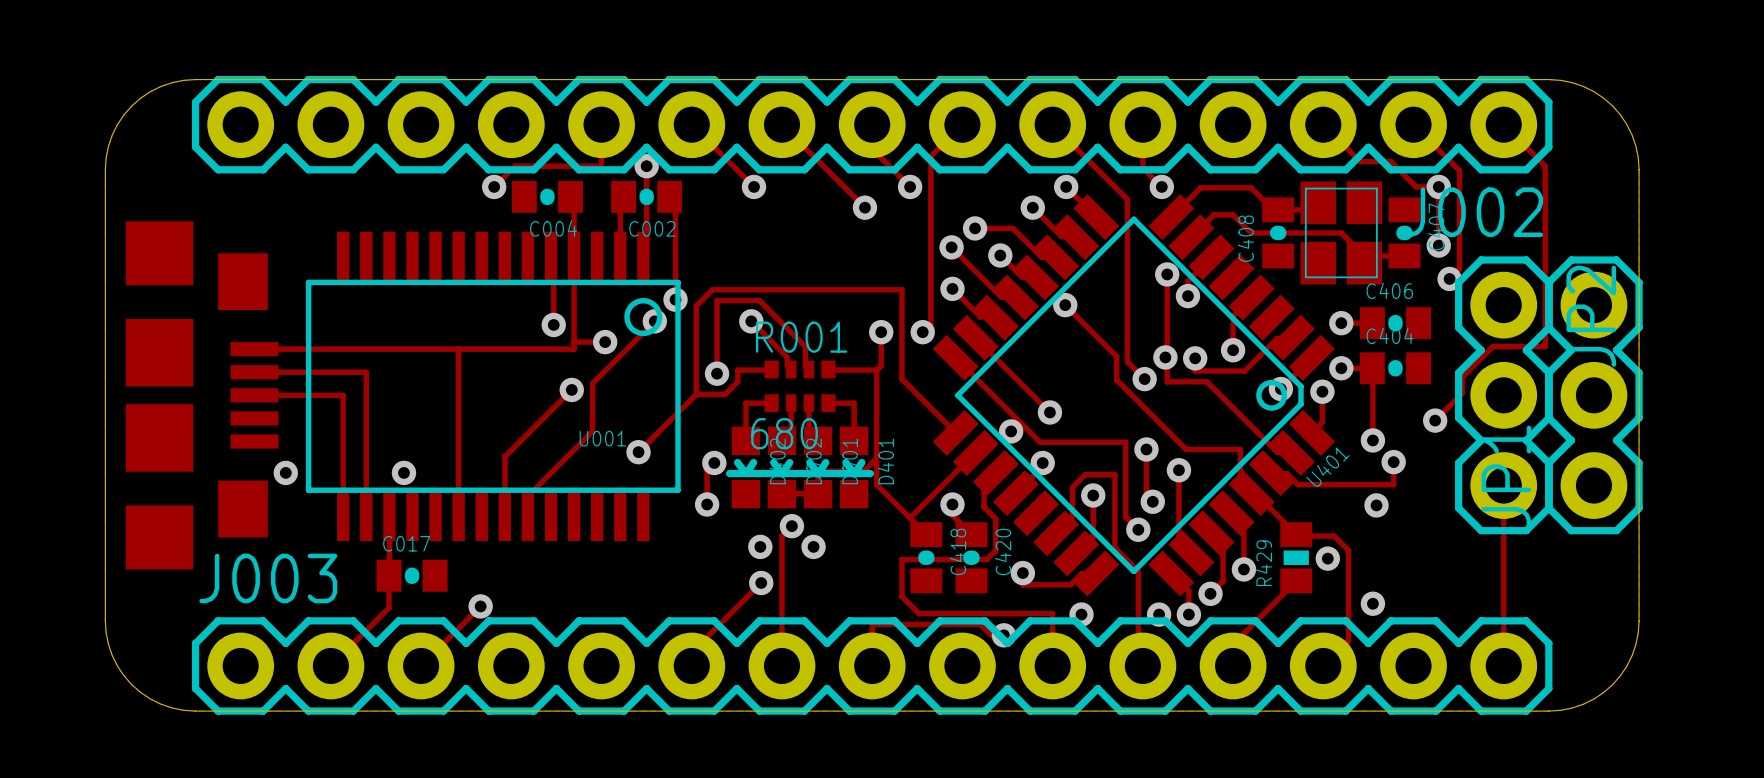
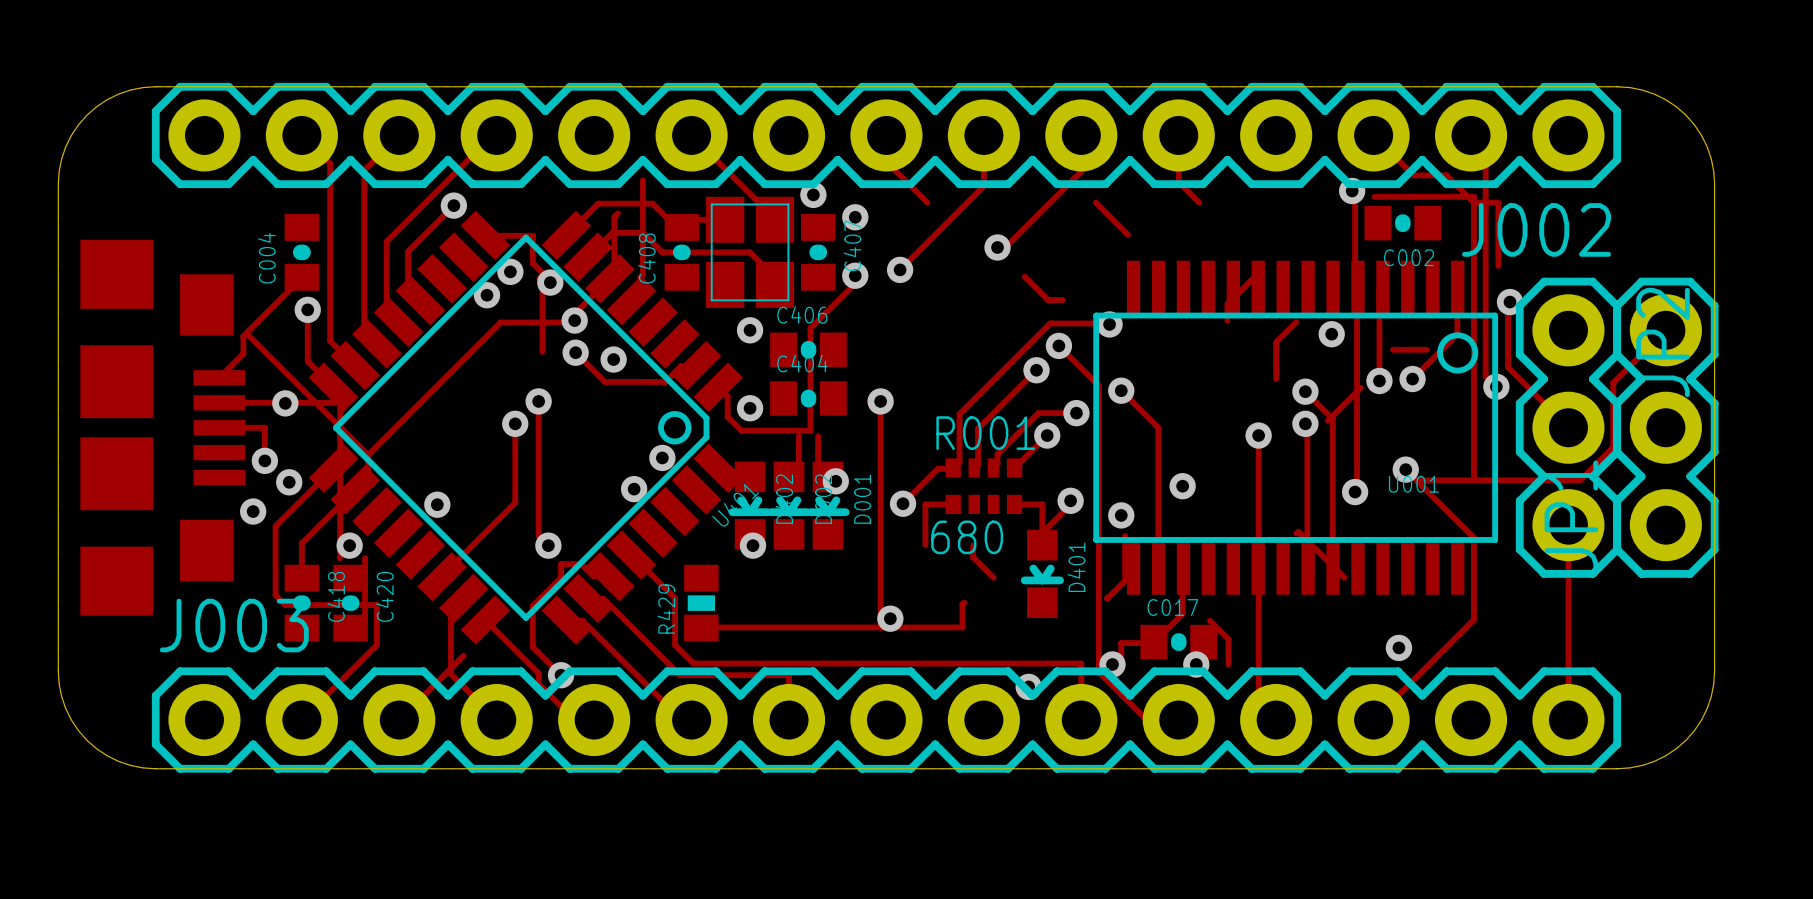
track: none -> (301, 135) (330, 163) (330, 341) (355, 365)
track: none -> (399, 135) (364, 170) (364, 330) (377, 343)
track: none -> (496, 135) (492, 135) (386, 241) (386, 309) (398, 321)
track: (601, 124) (601, 166) (514, 166) (494, 186) -> none
track: (781, 124) (864, 207) -> none
track: (962, 124) (930, 156) (930, 324) (922, 332) -> (983, 135) (983, 186) (900, 269)
track: (1052, 124) (1127, 199) (1127, 361) (1144, 379) -> (1081, 135) (1081, 171) (1005, 247)
track: (1503, 124) (1545, 166) (1545, 346) (1492, 346) (1462, 377) (1462, 393) (1435, 420) -> none
track: (1427, 138) (1459, 170) (1459, 269) (1449, 278) -> (1485, 150) (1485, 376) (1496, 386)
via: (646, 166) -> none
track: none -> (1352, 190) (1355, 193) (1355, 286) (1357, 287) (1357, 490) (1355, 492)
via: none -> (1352, 190)
via: none -> (813, 194)
track: none -> (1374, 196) (1473, 196) (1473, 480)
via position: (494, 186) -> (453, 205)
via: (754, 186) -> none
via: (910, 186) -> none
via: (1066, 186) -> none
via: (1161, 186) -> none
via: (1438, 186) -> none
track: none -> (453, 205) (408, 251) (408, 288) (419, 300)
C004 rotation: 0° (547, 196) -> 90° clockwise (301, 252)
C004 position: (547, 196) -> (301, 252)
track: (570, 196) (574, 196) (574, 349) (254, 349) -> (301, 277) (243, 336) (243, 353) (219, 377)
C002 position: (646, 196) -> (1402, 223)
track: (670, 196) (675, 202) (675, 299) -> none
track: none -> (725, 219) (689, 219) (681, 227) (676, 227) (652, 203) (598, 203) (566, 235)
track: (1318, 202) (1311, 209) (1273, 209) (1251, 187) (1200, 187) (1171, 217) -> none
via position: (864, 207) -> (855, 217)
track: (1032, 207) (1061, 236) (1076, 237) -> none
via: (1032, 207) -> none
track: none -> (486, 235) (532, 235) (532, 263) (550, 282)
track: (975, 228) (1012, 228) (1041, 257) (1056, 257) -> none
C408 position: (1278, 232) -> (681, 252)
part position: (1341, 232) -> (750, 252)
C407 position: (1404, 232) -> (818, 252)
track: none -> (588, 257) (612, 232) (642, 232) (662, 252) (750, 252) (774, 277) (774, 284)
track: (1191, 237) (1213, 214) (1233, 214) (1251, 232) (1341, 232) (1364, 256) (1364, 263) (1371, 256) (1404, 256) -> none
via: (1438, 245) -> none
track: (951, 247) (1001, 297) (1015, 297) -> none
via: (951, 247) -> none
via: none -> (900, 269)
via: none -> (510, 271)
track: none -> (855, 275) (855, 283) (810, 328) (810, 430) (741, 430) (727, 417) (727, 396) (718, 387)
via: none -> (855, 275)
via: (1000, 255) -> none
track: none -> (609, 278) (574, 313) (572, 322) (500, 322) (368, 455)
via: none -> (550, 282)
track: none -> (1382, 287) (1379, 291) (1379, 380)
track: none -> (1457, 287) (1457, 334) (1412, 379)
via: none -> (487, 295)
track: (1167, 274) (1167, 381) (1206, 381) (1277, 452) (1291, 452) -> none
via: (1167, 274) -> none
track: none -> (307, 309) (307, 361) (333, 386)
via: none -> (307, 309)
track: none -> (1508, 311) (1508, 367) (1568, 427)
track: (952, 288) (980, 316) (995, 317) -> none
via: (952, 288) -> none
via: none -> (574, 320)
via: (1187, 296) -> none
via: (675, 299) -> none
track: none -> (1109, 324) (1050, 323) (959, 414) (959, 461) (953, 467)
track: (1065, 305) (1116, 356) (1116, 380) (1186, 449) (1240, 449) (1240, 481) (1251, 492) -> none
via position: (1065, 305) -> (1109, 324)
track: none -> (1665, 330) (1613, 382) (1613, 447) (1580, 480) (1420, 480) (1418, 482)
track: none -> (246, 333) (368, 455)
via: none -> (1331, 334)
via: none -> (1058, 345)
track: (654, 321) (592, 383) (592, 431) (528, 495) (527, 516) -> none
via: (654, 321) -> none
track: (751, 321) (787, 357) (787, 365) (791, 369) -> none
via position: (751, 321) -> (750, 330)
via: (1341, 323) -> none
C406 position: (1395, 323) -> (808, 349)
via: (553, 324) -> none
track: none -> (575, 352) (604, 381) (665, 381) (680, 366) (696, 365)
via: none -> (575, 352)
via: none -> (613, 359)
track: (881, 332) (881, 365) (876, 370) -> none
via: (881, 332) -> none
via: (922, 332) -> none
track: (975, 337) (1049, 412) -> none
track: (1291, 337) (1277, 338) (1244, 370) (1195, 370) (1195, 358) -> none
track: (574, 342) (605, 342) -> none
via: (605, 342) -> none
track: none -> (1036, 370) (978, 428) (978, 464) (974, 467)
via: none -> (1036, 370)
track: (458, 349) (458, 516) -> none
via: (1233, 350) -> none
via: none -> (1412, 379)
via: none -> (1379, 380)
via: (1165, 357) -> none
via: none -> (1496, 386)
track: (956, 358) (1040, 442) (1125, 442) (1125, 517) (1138, 529) -> none
via: (1195, 358) -> none
track: none -> (1121, 390) (1158, 427) (1158, 567)
via: none -> (1121, 390)
track: none -> (1305, 391) (1332, 418) (1333, 567)
via: none -> (1305, 391)
track: (1341, 368) (1372, 368) (1372, 440) -> none
via: (1341, 368) -> none
C404 position: (1395, 368) -> (808, 398)
track: (771, 369) (737, 370) (737, 381) (725, 394) (696, 394) -> none
track: (808, 369) (805, 366) (805, 346) (759, 300) (717, 300) (717, 373) -> none
track: (828, 369) (876, 370) -> none
track: none -> (538, 401) (538, 535) (548, 545)
track: none -> (880, 401) (880, 627)
via: none -> (880, 401)
track: (876, 370) (876, 458) (864, 471) (818, 471) (818, 494) (781, 493) -> none
via: none -> (285, 403)
via: (717, 373) -> none
via: none -> (750, 408)
via: (1144, 379) -> none
track: none -> (1076, 413) (1038, 413) (997, 454) (997, 463) (993, 467)
via: none -> (1076, 413)
U001 position: (493, 386) -> (1295, 427)
R001 position: (800, 386) -> (983, 486)
track: (571, 389) (505, 456) (504, 516) -> none
via position: (571, 389) -> (538, 401)
via position: (1280, 389) -> (1305, 423)
track: none -> (515, 423) (515, 502) (442, 576)
via: none -> (515, 423)
track: none -> (1305, 423) (1307, 425) (1308, 567)
track: (1322, 391) (1322, 422) (1312, 432) -> none
via: (1322, 391) -> none
track: (696, 394) (696, 306) (712, 289) (901, 289) (901, 379) (955, 432) -> none
track: (696, 394) (638, 452) -> none
track: (296, 395) (343, 395) (343, 516) -> (264, 427) (264, 460)
U401 position: (1133, 395) -> (525, 427)
track: none -> (1047, 435) (1015, 467)
via: none -> (1047, 435)
via: none -> (1258, 435)
track: (771, 403) (745, 403) (745, 440) -> (953, 504) (925, 504) (925, 545)
track: (828, 403) (854, 403) (854, 440) -> (1014, 504) (1042, 504) (1042, 545)
via: (1049, 412) -> none
track: none -> (368, 455) (368, 475) (301, 543) (301, 578)
via: (1435, 420) -> none
via: none -> (662, 457)
via: none -> (264, 460)
via: (1011, 431) -> none
track: none -> (953, 467) (938, 468) (903, 503)
via position: (1372, 440) -> (1405, 469)
via: none -> (835, 481)
via: none -> (289, 482)
track: (1146, 449) (1146, 495) (1152, 501) -> none
track: (975, 452) (910, 518) -> none
via: none -> (1355, 492)
track: (874, 460) (876, 462) (876, 484) (926, 534) -> none
track: (1393, 462) (1393, 484) (1298, 484) (1287, 473) (1271, 473) -> none
via: (1393, 462) -> none
track: (714, 463) (707, 470) (707, 504) -> none
via: (714, 463) -> none
via: none -> (903, 503)
via: none -> (437, 504)
D401 position: (854, 467) -> (1042, 573)
track: (1178, 470) (1178, 541) (1191, 553) -> none
via: (1178, 470) -> none
via: (403, 472) -> none
track: (995, 473) (984, 485) (984, 507) (995, 518) (995, 550) (986, 559) (901, 559) (901, 596) (919, 613) -> (632, 555) (675, 598) (675, 645) (693, 663) (937, 663)
via position: (1093, 495) -> (1121, 515)
via: (1152, 501) -> none
via: none -> (349, 545)
via: none -> (548, 545)
via: (707, 504) -> none
via: none -> (752, 545)
via: (952, 504) -> none
via: (1376, 505) -> none
track: (1232, 513) (1243, 525) (1243, 569) -> none
track: none -> (1183, 567) (1182, 613) (1154, 642)
track: (791, 526) (781, 536) (781, 624) -> (588, 598) (603, 599) (679, 675) (789, 675)
via: (791, 526) -> none
via: (1138, 529) -> none
track: none -> (609, 576) (593, 575) (581, 564) (561, 564) (561, 577) (532, 606) (532, 646) (561, 675)
track: (1056, 533) (1072, 516) (1072, 487) (1085, 474) (1114, 474) (1114, 547) (1138, 571) (1138, 661) (1142, 665) -> (1058, 345) (1098, 385) (1098, 672) (1146, 720) (1178, 720)
track: (1211, 533) (1223, 544) (1223, 581) (1210, 593) -> none
track: (1296, 534) (1334, 536) (1348, 550) (1348, 640) -> (1405, 469) (1473, 537) (1473, 619) (1400, 692)
via: (760, 546) -> none
via: (813, 546) -> none
track: none -> (463, 598) (450, 611) (450, 674) (496, 720)
C418 position: (926, 557) -> (301, 603)
track: none -> (964, 602) (962, 604) (962, 627) (701, 627)
C420 position: (971, 557) -> (350, 603)
R429 position: (1296, 557) -> (701, 603)
via: (1327, 558) -> none
via: (1243, 569) -> none
via: none -> (890, 618)
track: none -> (486, 620) (538, 673) (538, 683) (574, 720) (594, 720)
track: (1022, 573) (1022, 584) (1070, 584) (1081, 573) (1095, 573) -> none
via: (1022, 573) -> none
track: (389, 575) (389, 607) -> (333, 468) (275, 526) (275, 595) (285, 605) (376, 605) (376, 645) (364, 657)
C017 position: (412, 575) -> (1178, 642)
track: (1296, 581) (1233, 644) (1233, 665) -> (1258, 435) (1258, 702) (1276, 720)
track: (761, 582) (691, 652) (691, 665) -> (566, 620) (582, 620) (681, 720) (691, 720)
via: (761, 582) -> none
track: none -> (1153, 642) (1121, 643) (1121, 663)
via: (1210, 593) -> none
via: none -> (1398, 647)
via: (1372, 603) -> none
via: (480, 606) -> none
via: (1188, 614) -> none
via: none -> (561, 675)
track: (1003, 635) (991, 635) (980, 624) (872, 624) (872, 665) -> none

